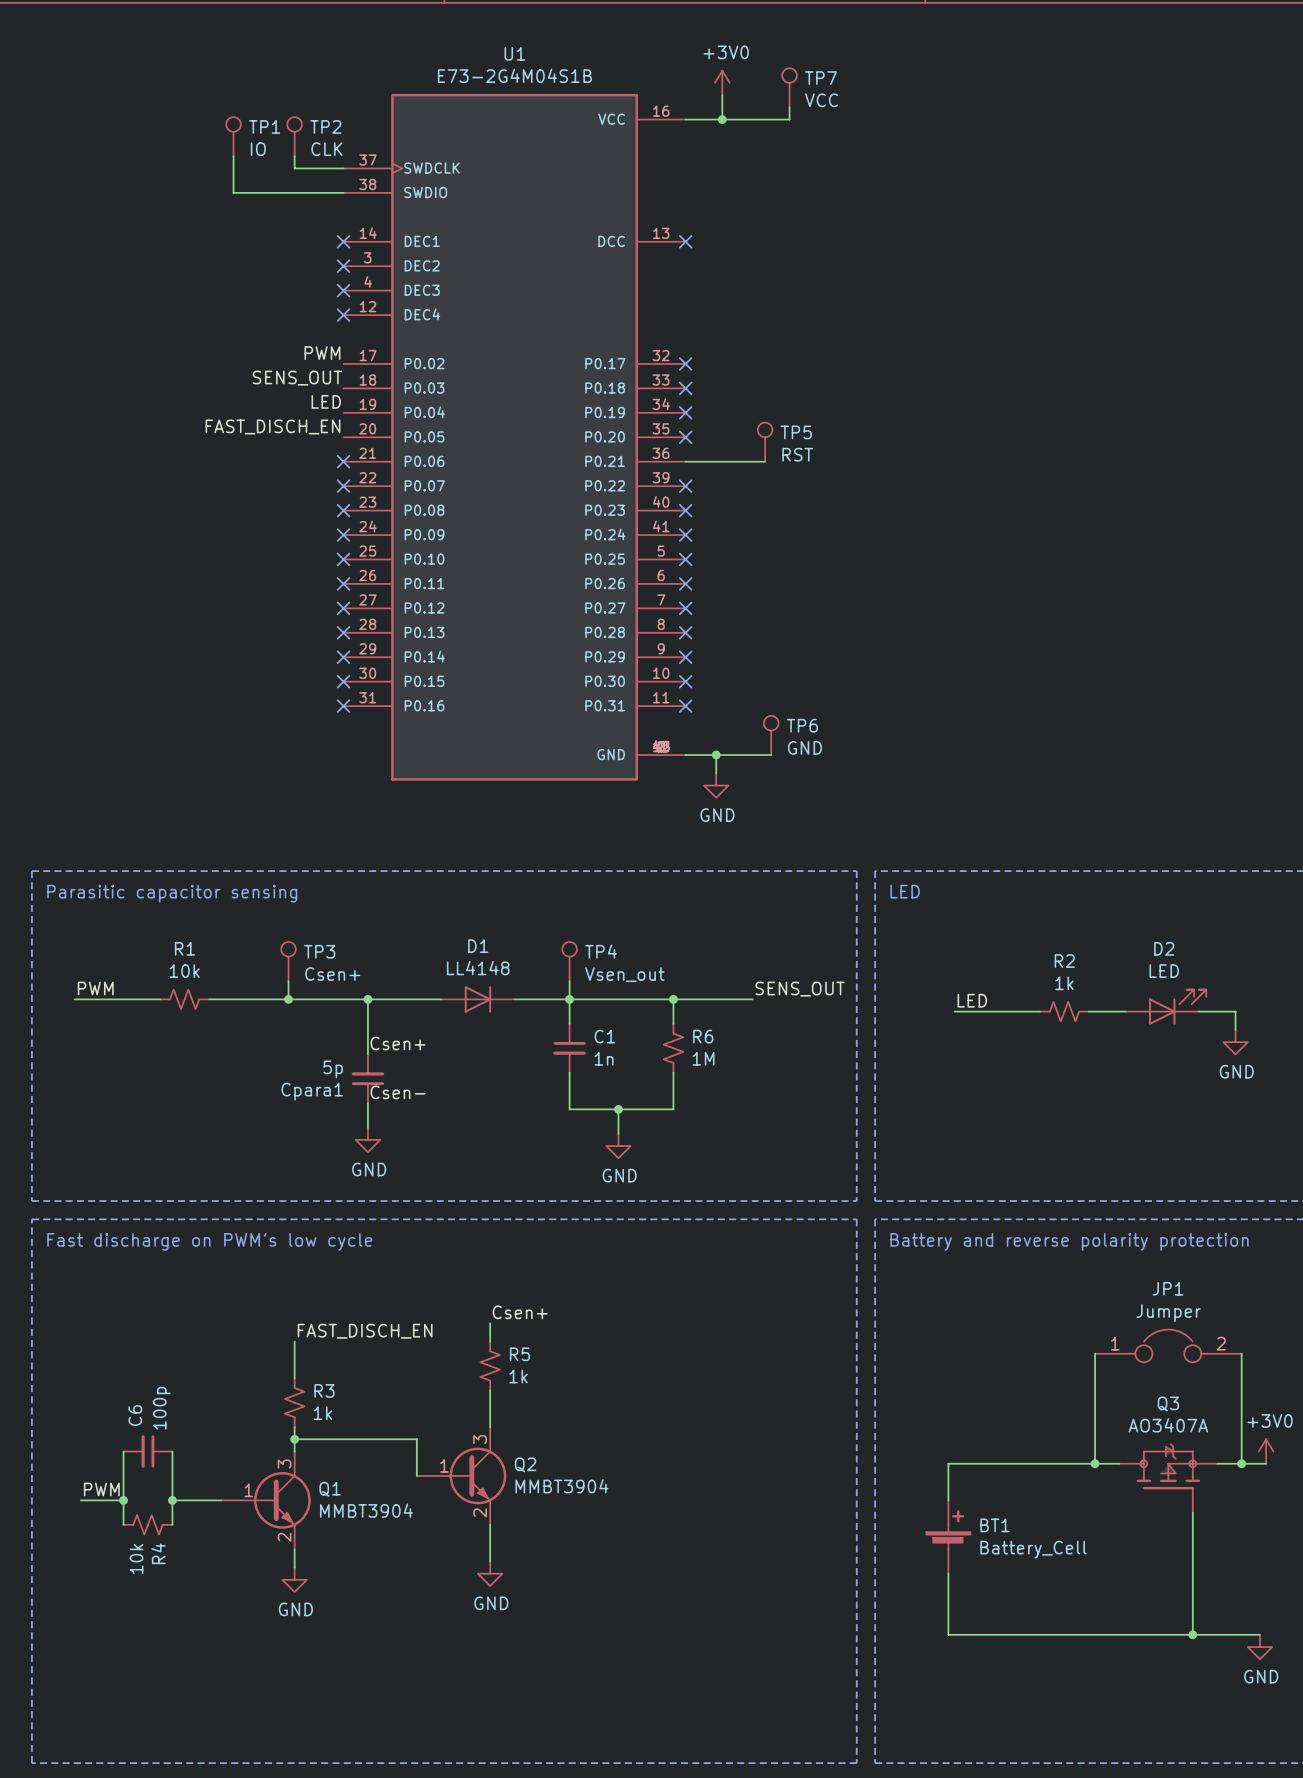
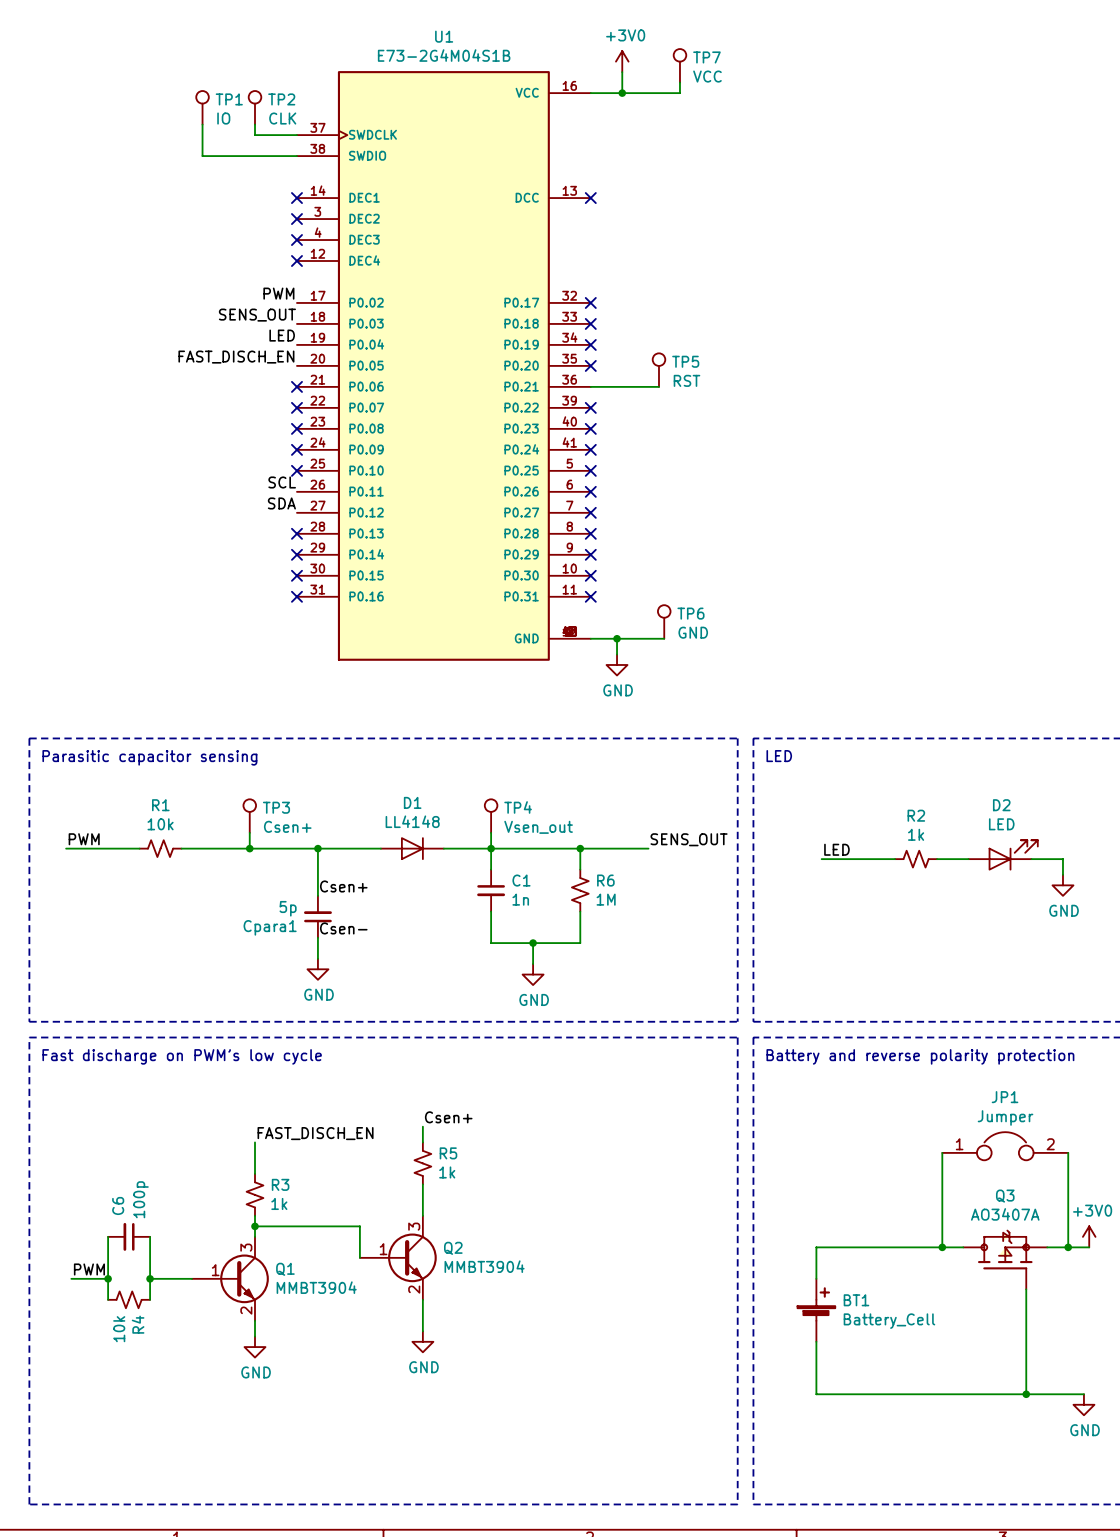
label: none -> SCL (282, 482)
no-connect mark: (343, 583) -> none
label: none -> SDA (281, 503)
no-connect mark: (343, 608) -> none

